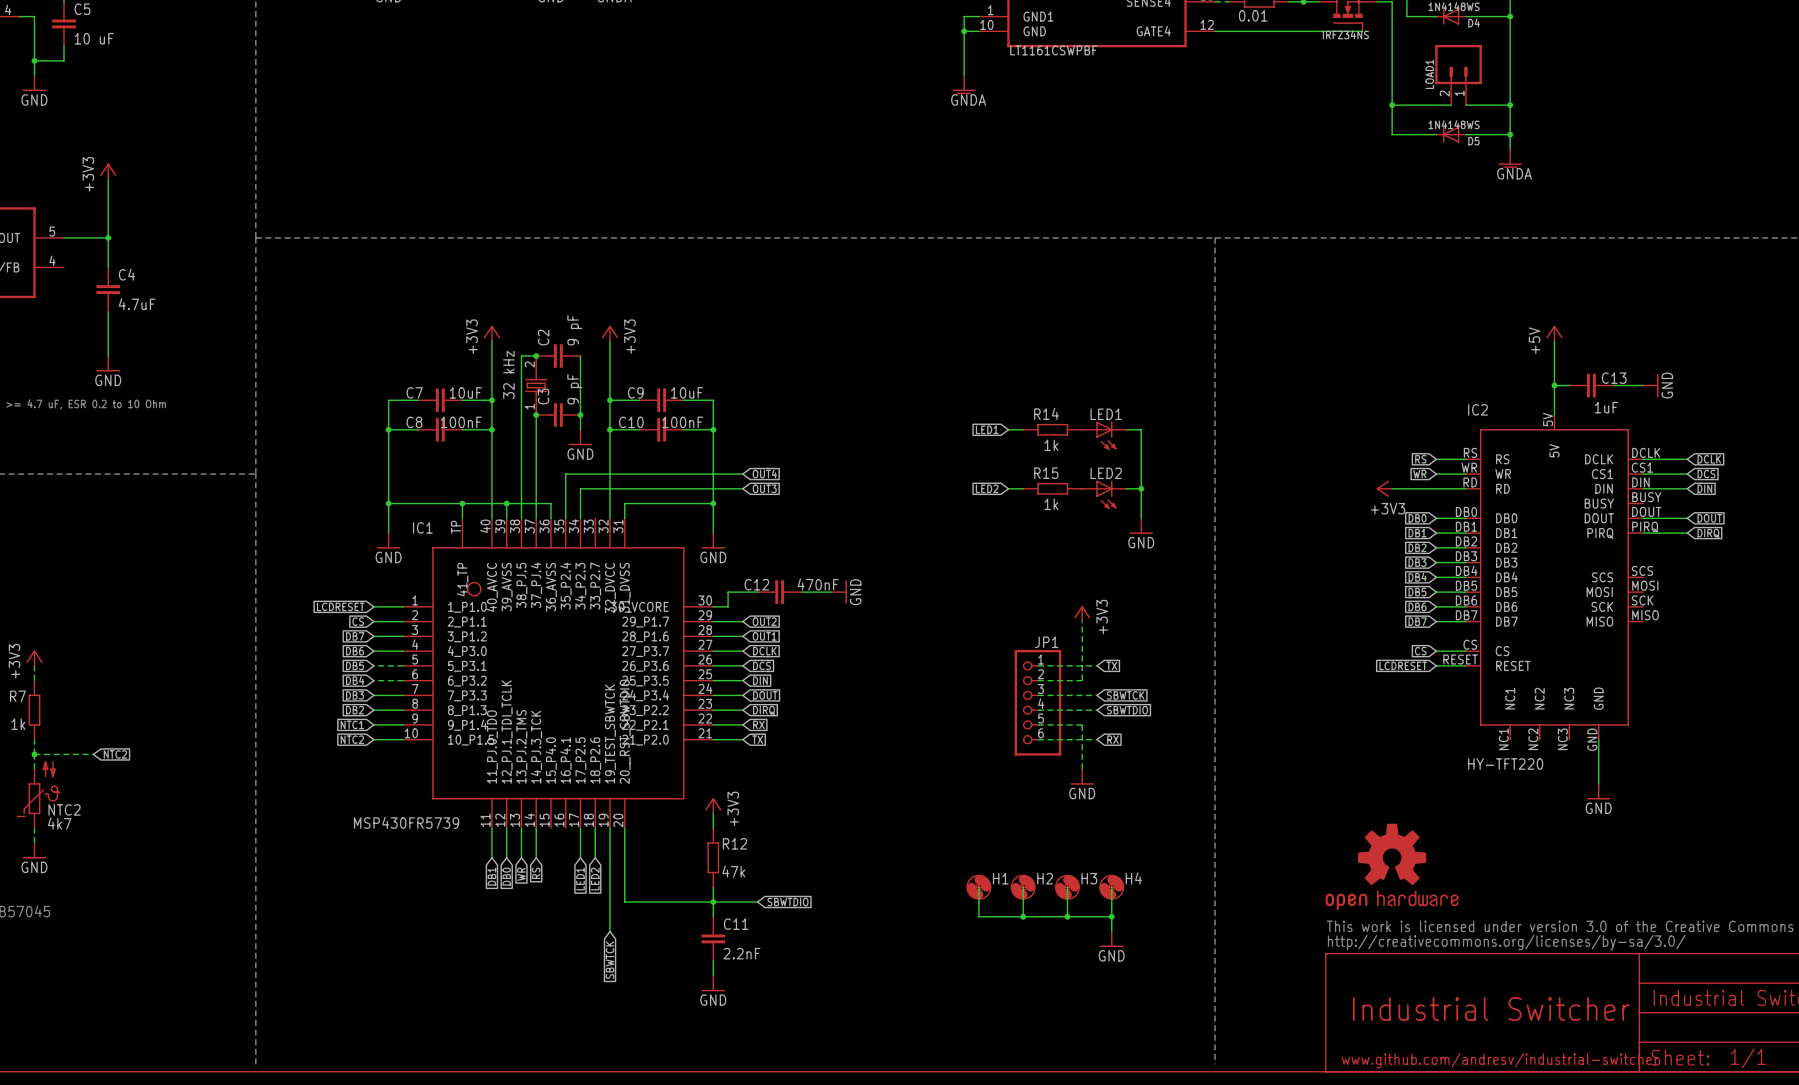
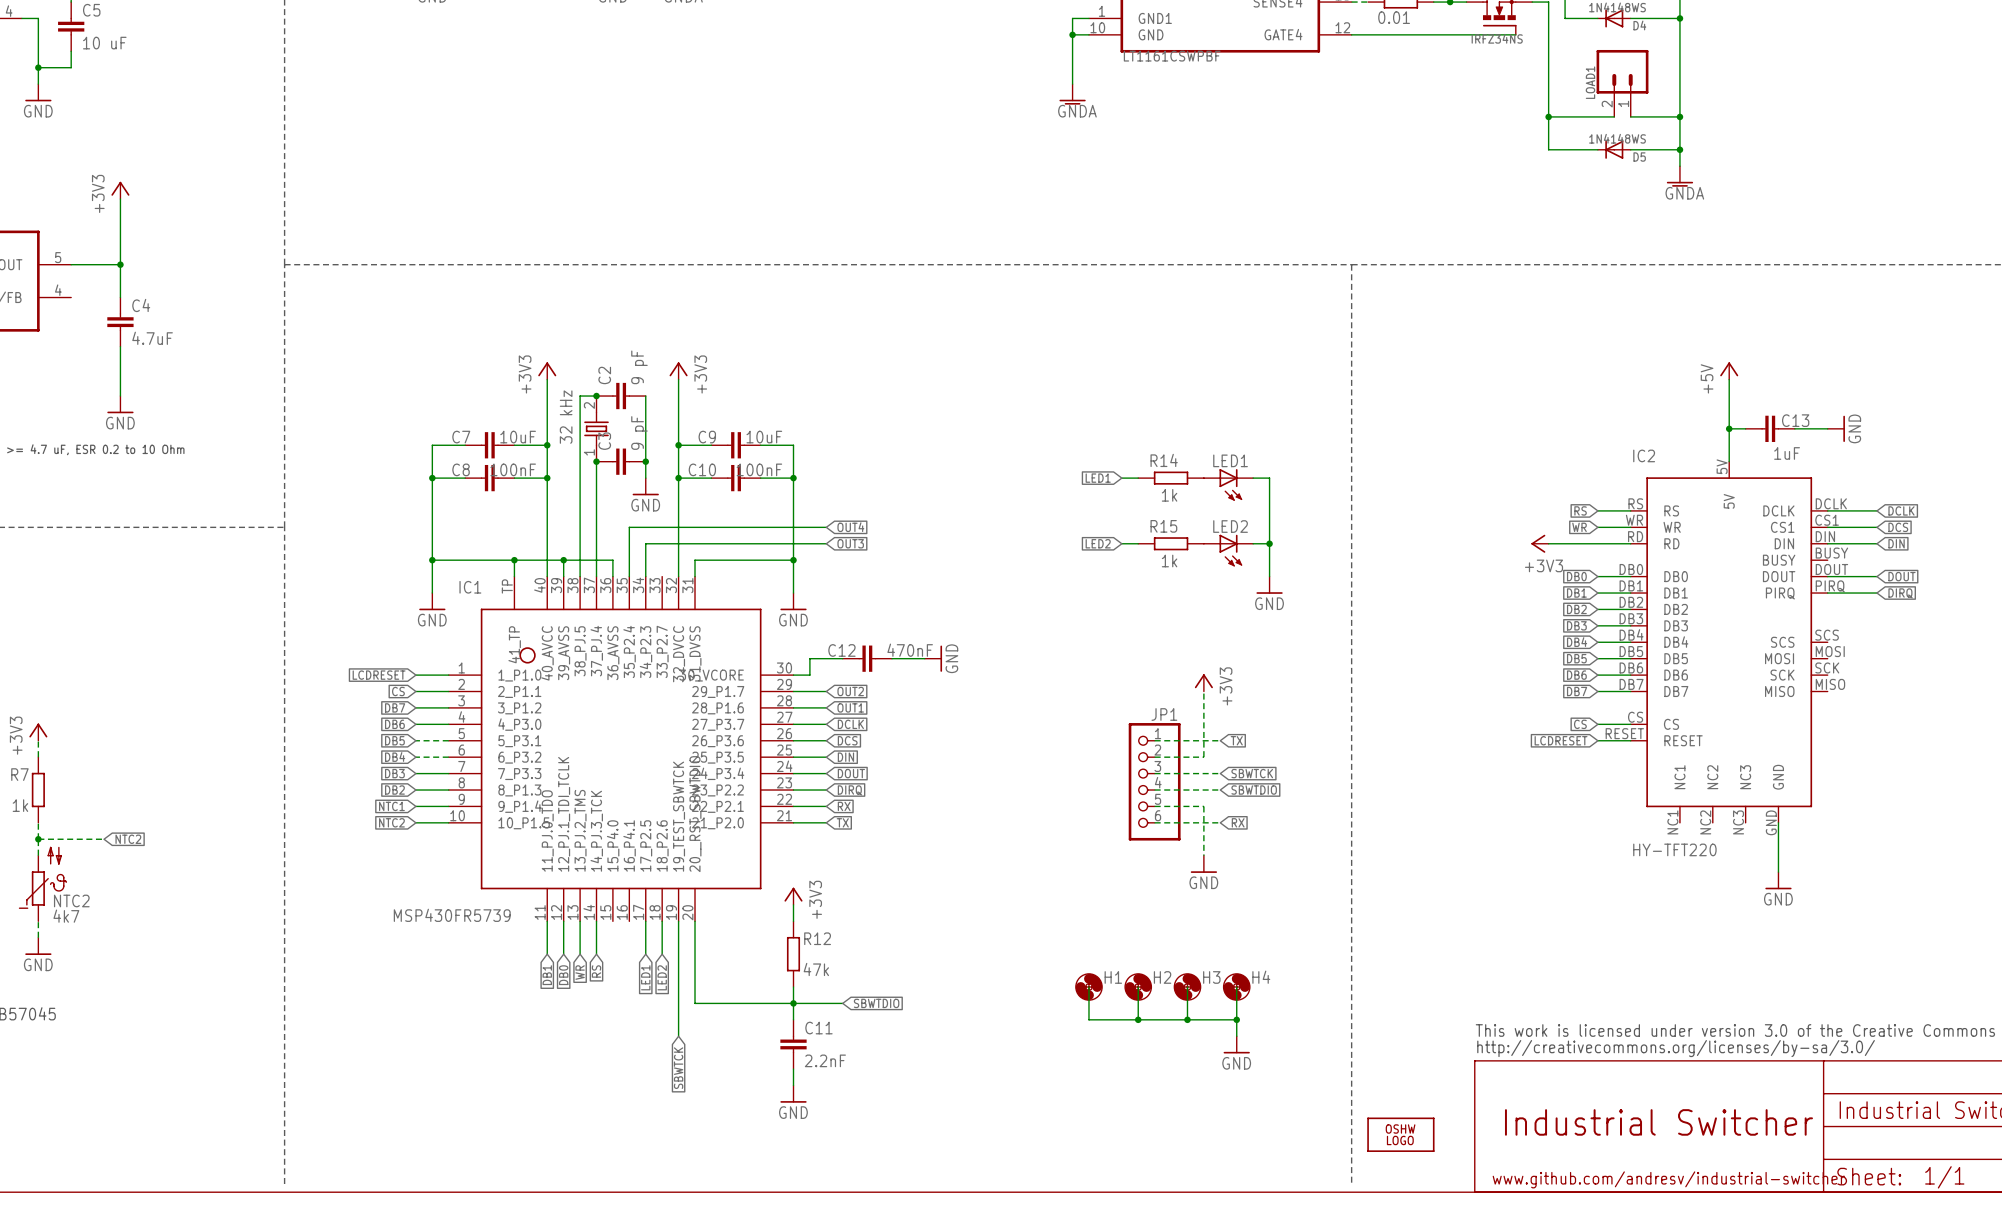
part: (1392, 866) -> none
part: none -> (1400, 1134)

